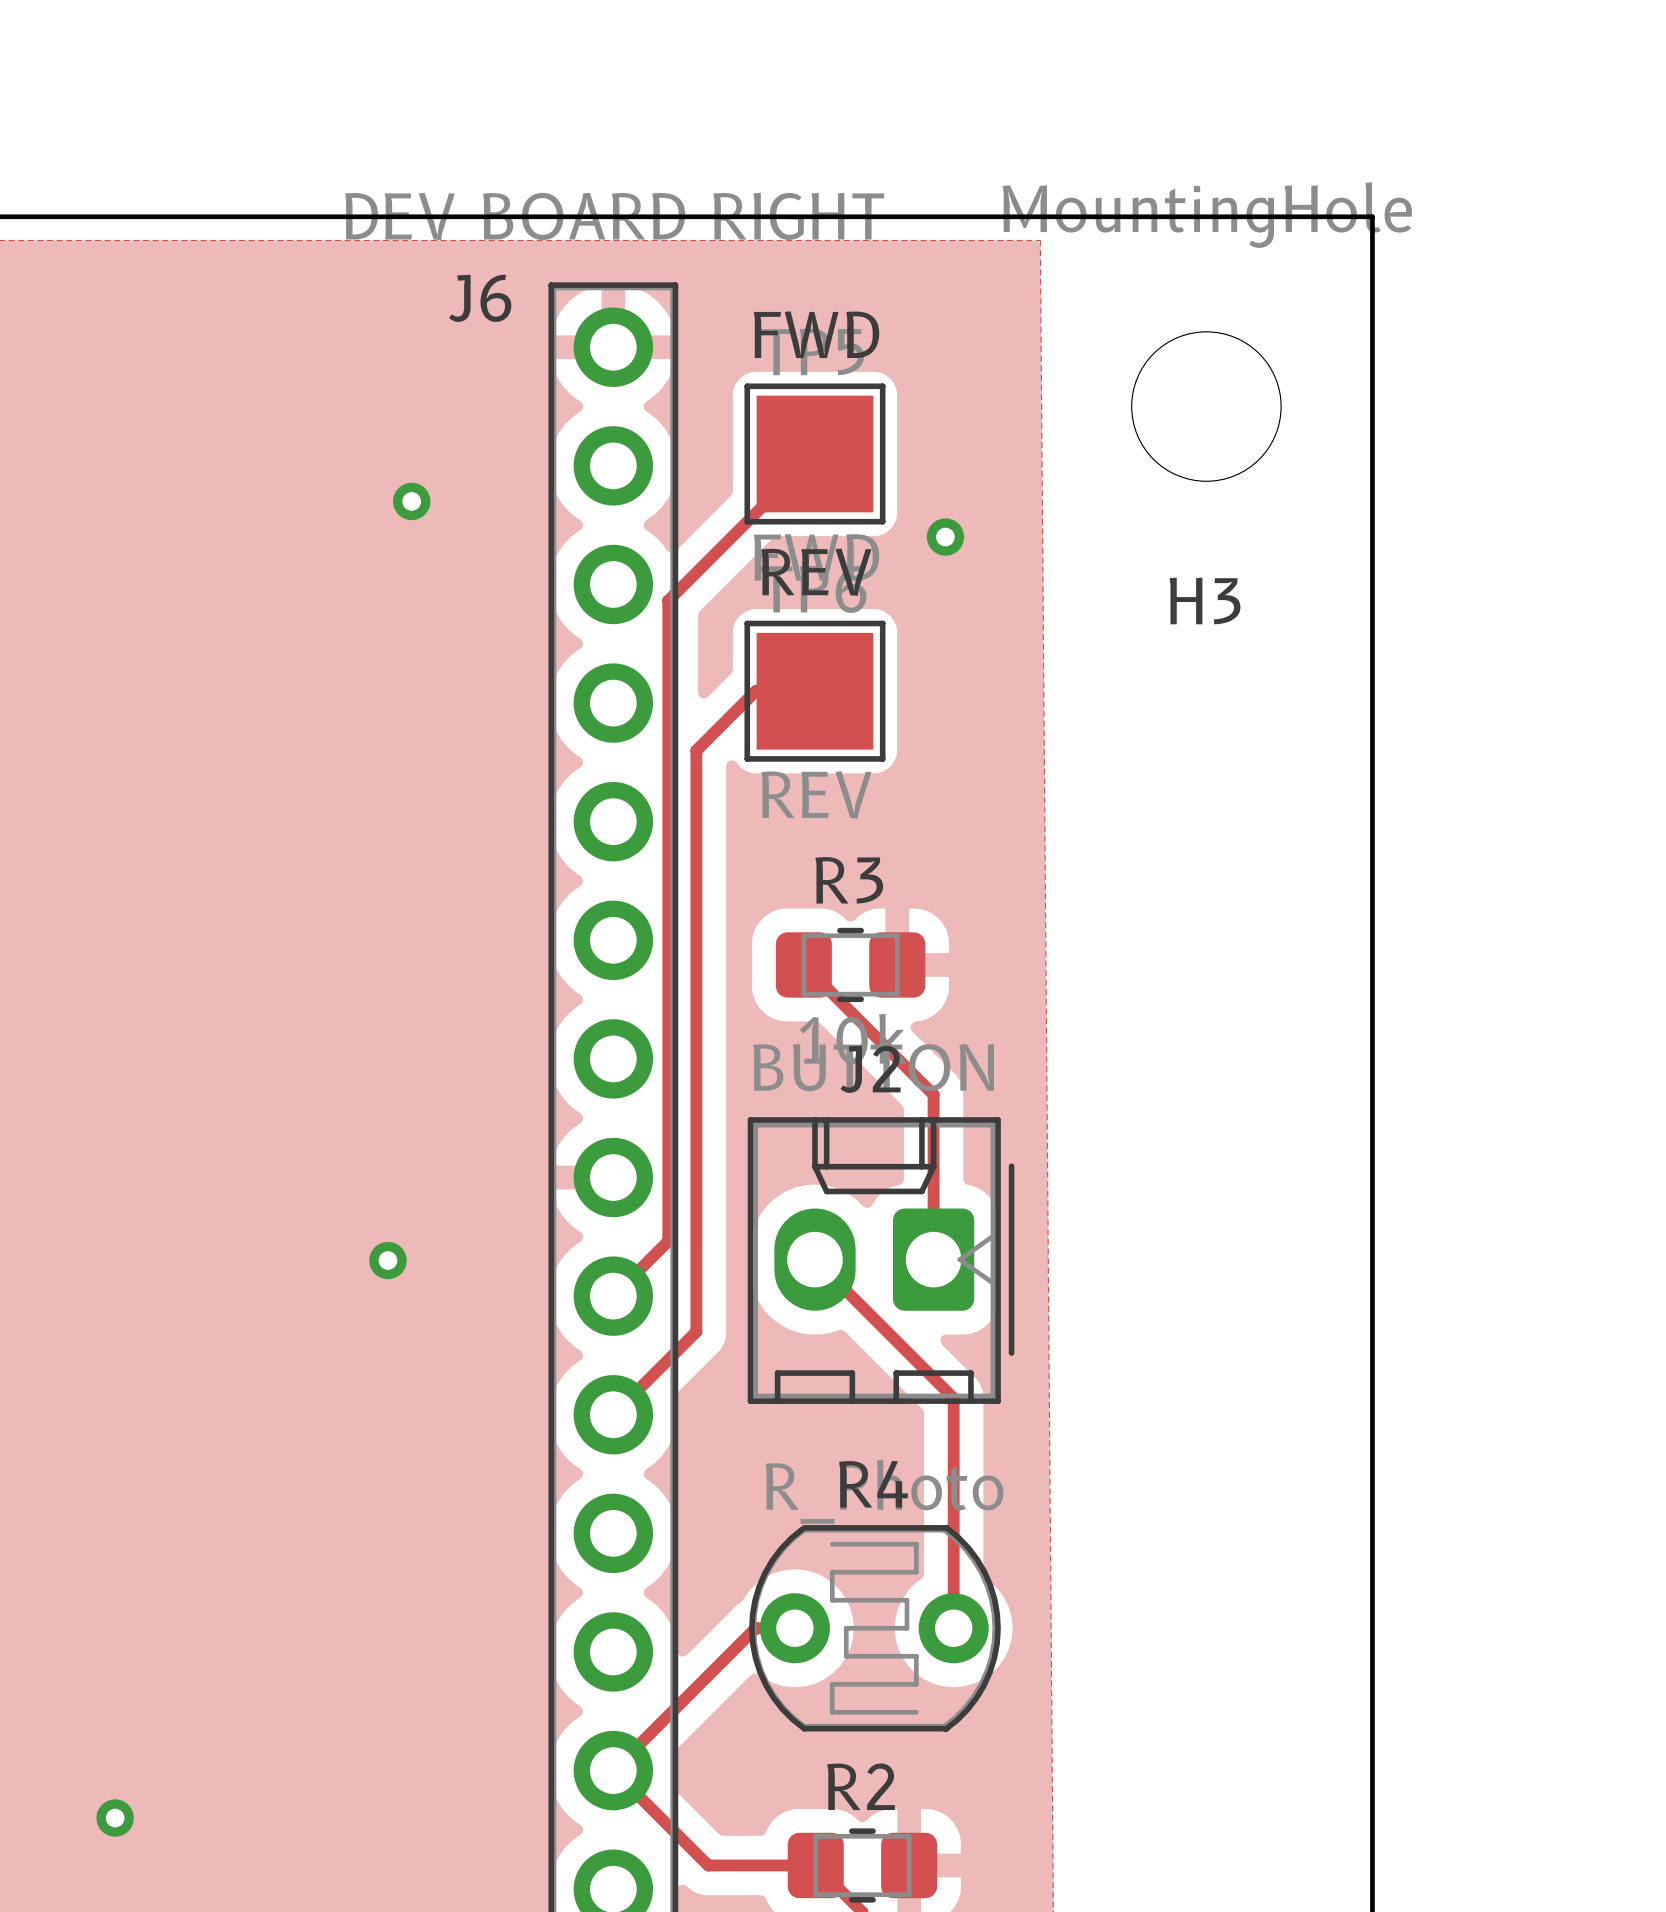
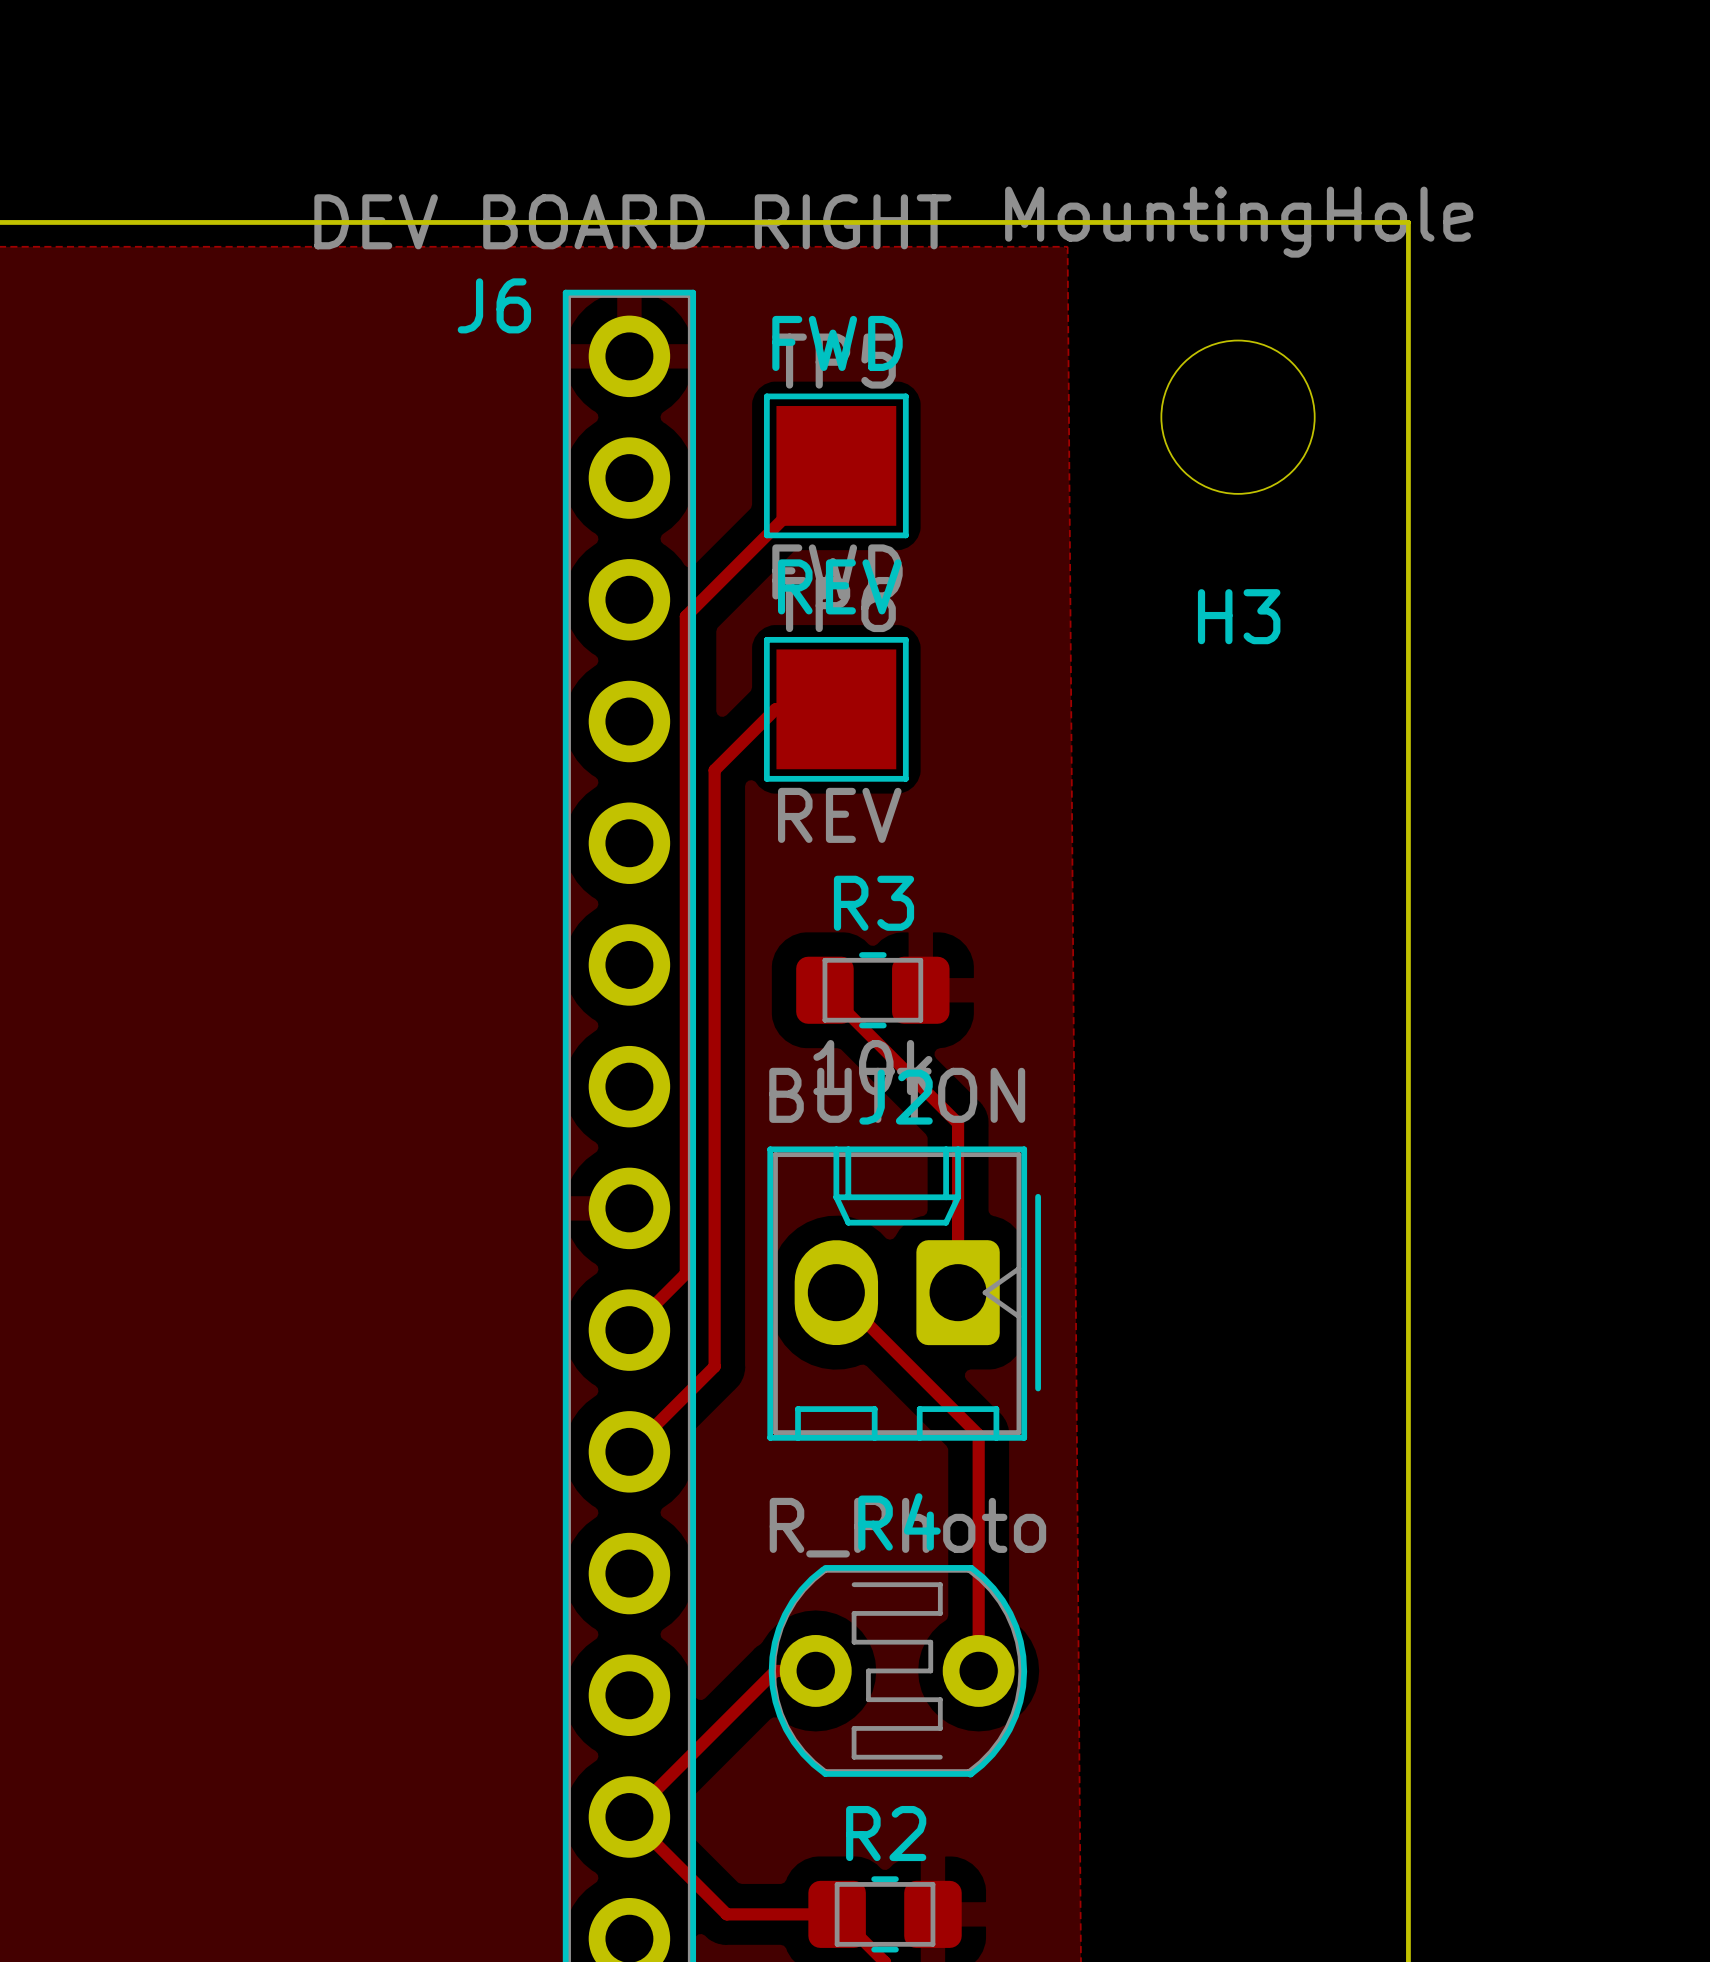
via: (411, 501) -> none
via: (945, 537) -> none
via: (387, 1260) -> none
via: (115, 1818) -> none

